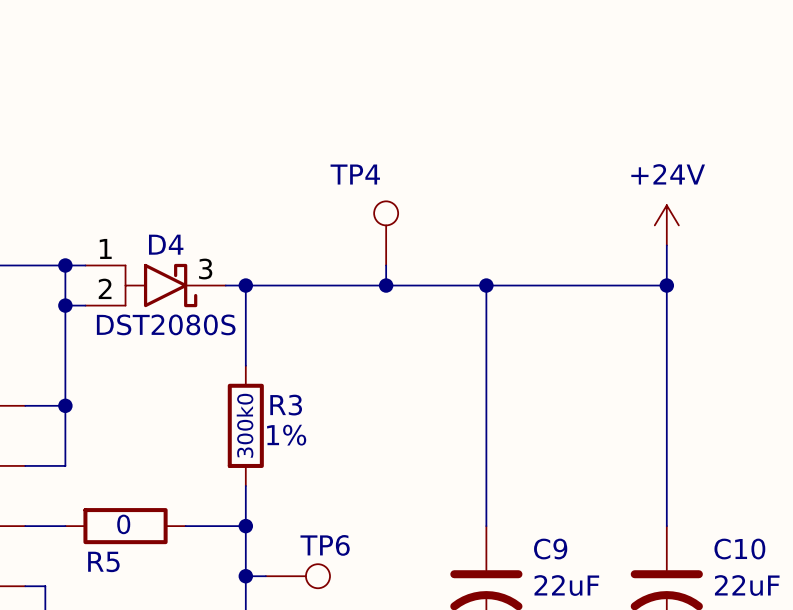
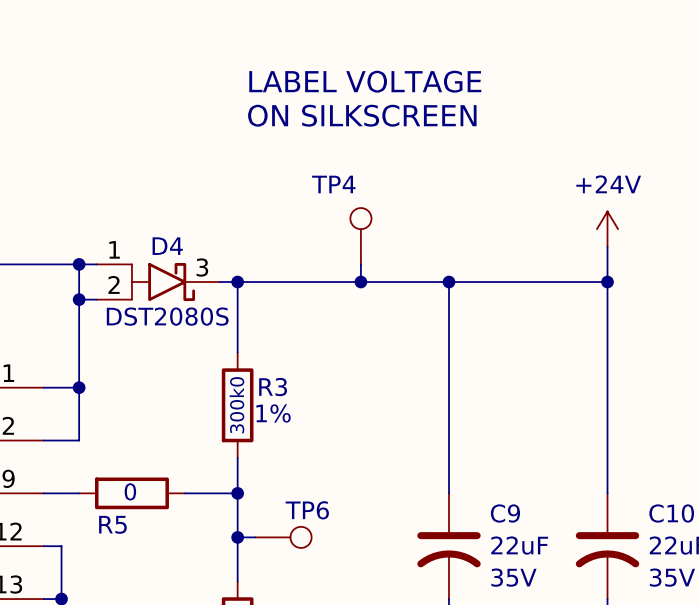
text: none -> LABEL VOLTAGE (365, 81)
text: none -> ON SILKSCREEN (362, 115)

